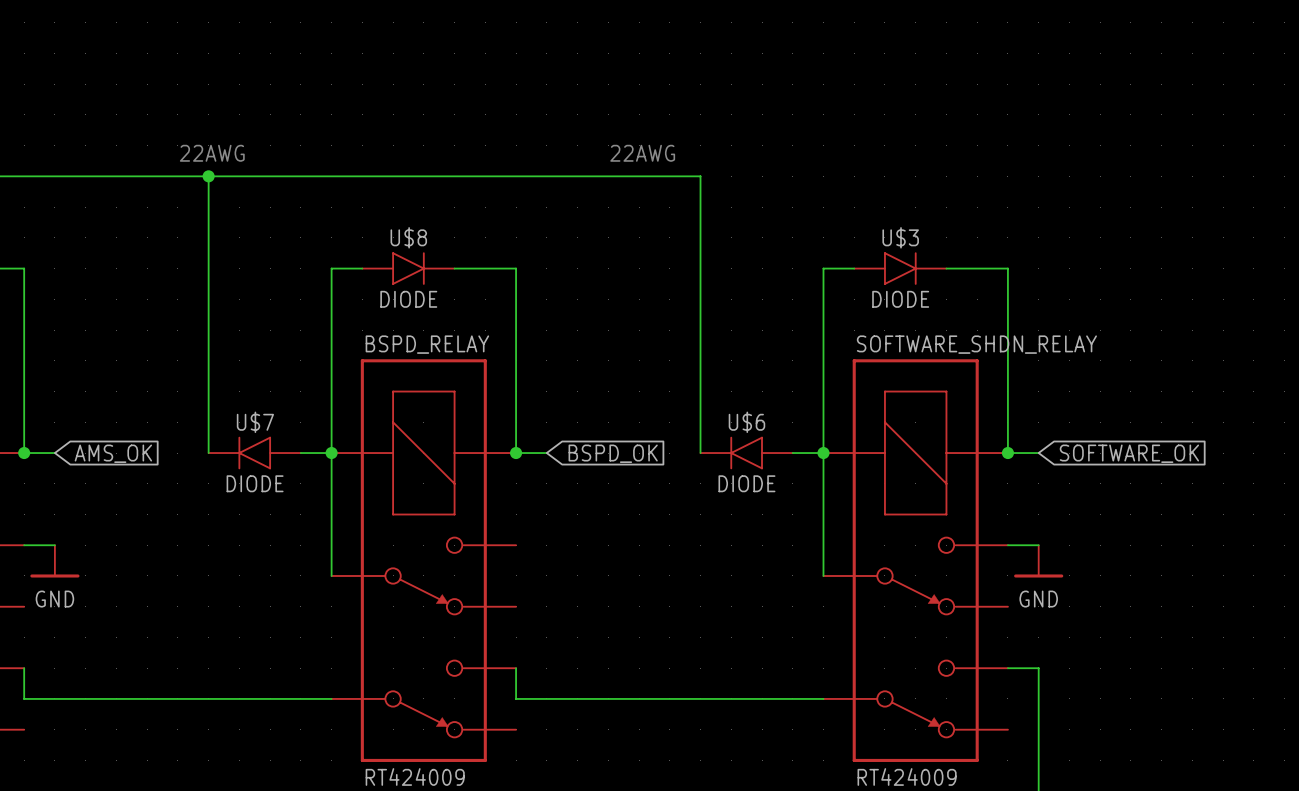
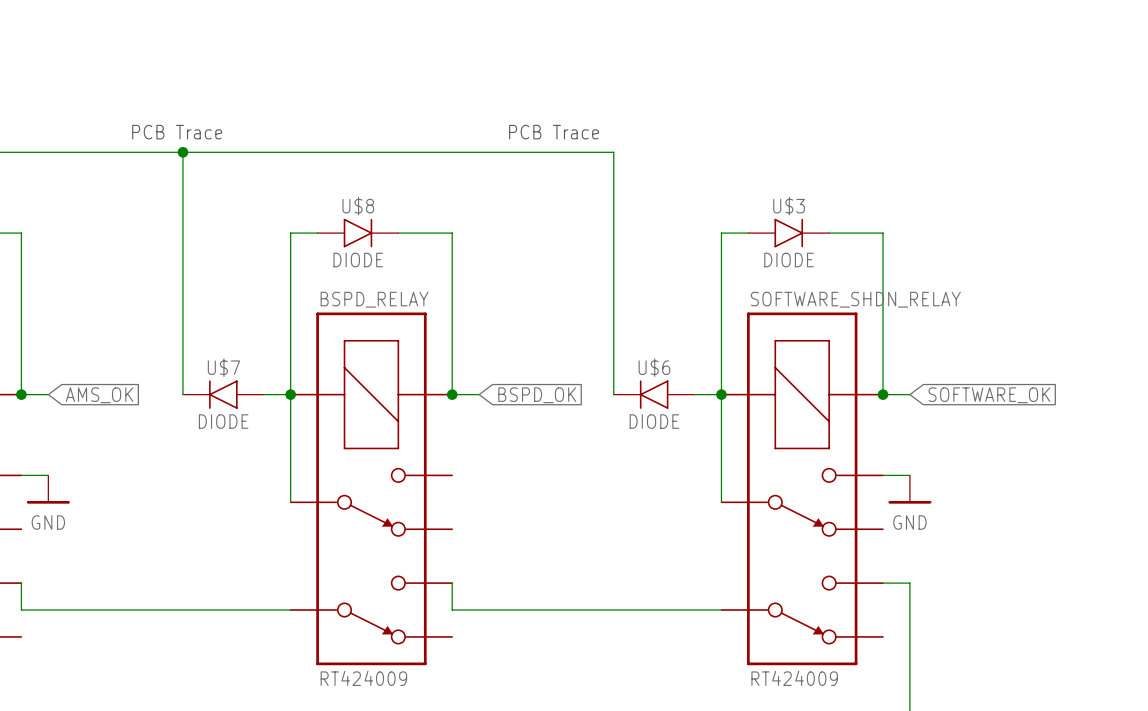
text: none -> PCB Trace (177, 132)
text: 22AWG (212, 153) -> none
text: none -> PCB Trace (554, 132)
text: 22AWG (642, 153) -> none

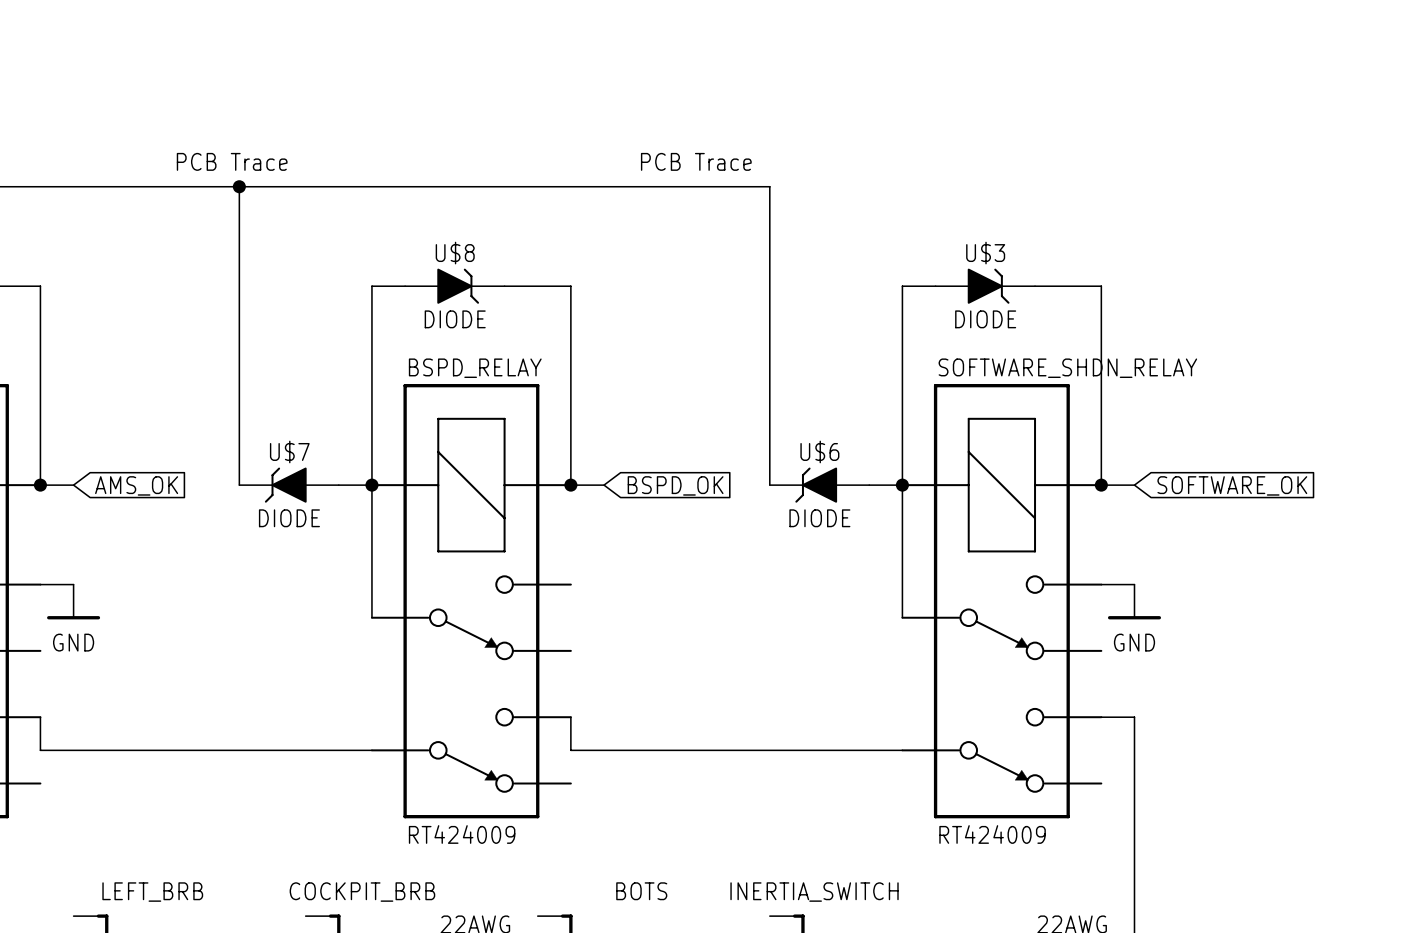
U$8 symbol: [317, 218, 399, 248] -> [405, 268, 505, 304]
U$3 symbol: [748, 218, 830, 248] -> [935, 268, 1036, 304]
U$7 symbol: [182, 380, 264, 409] -> [239, 467, 339, 503]
U$6 symbol: [613, 380, 695, 409] -> [769, 467, 870, 503]

